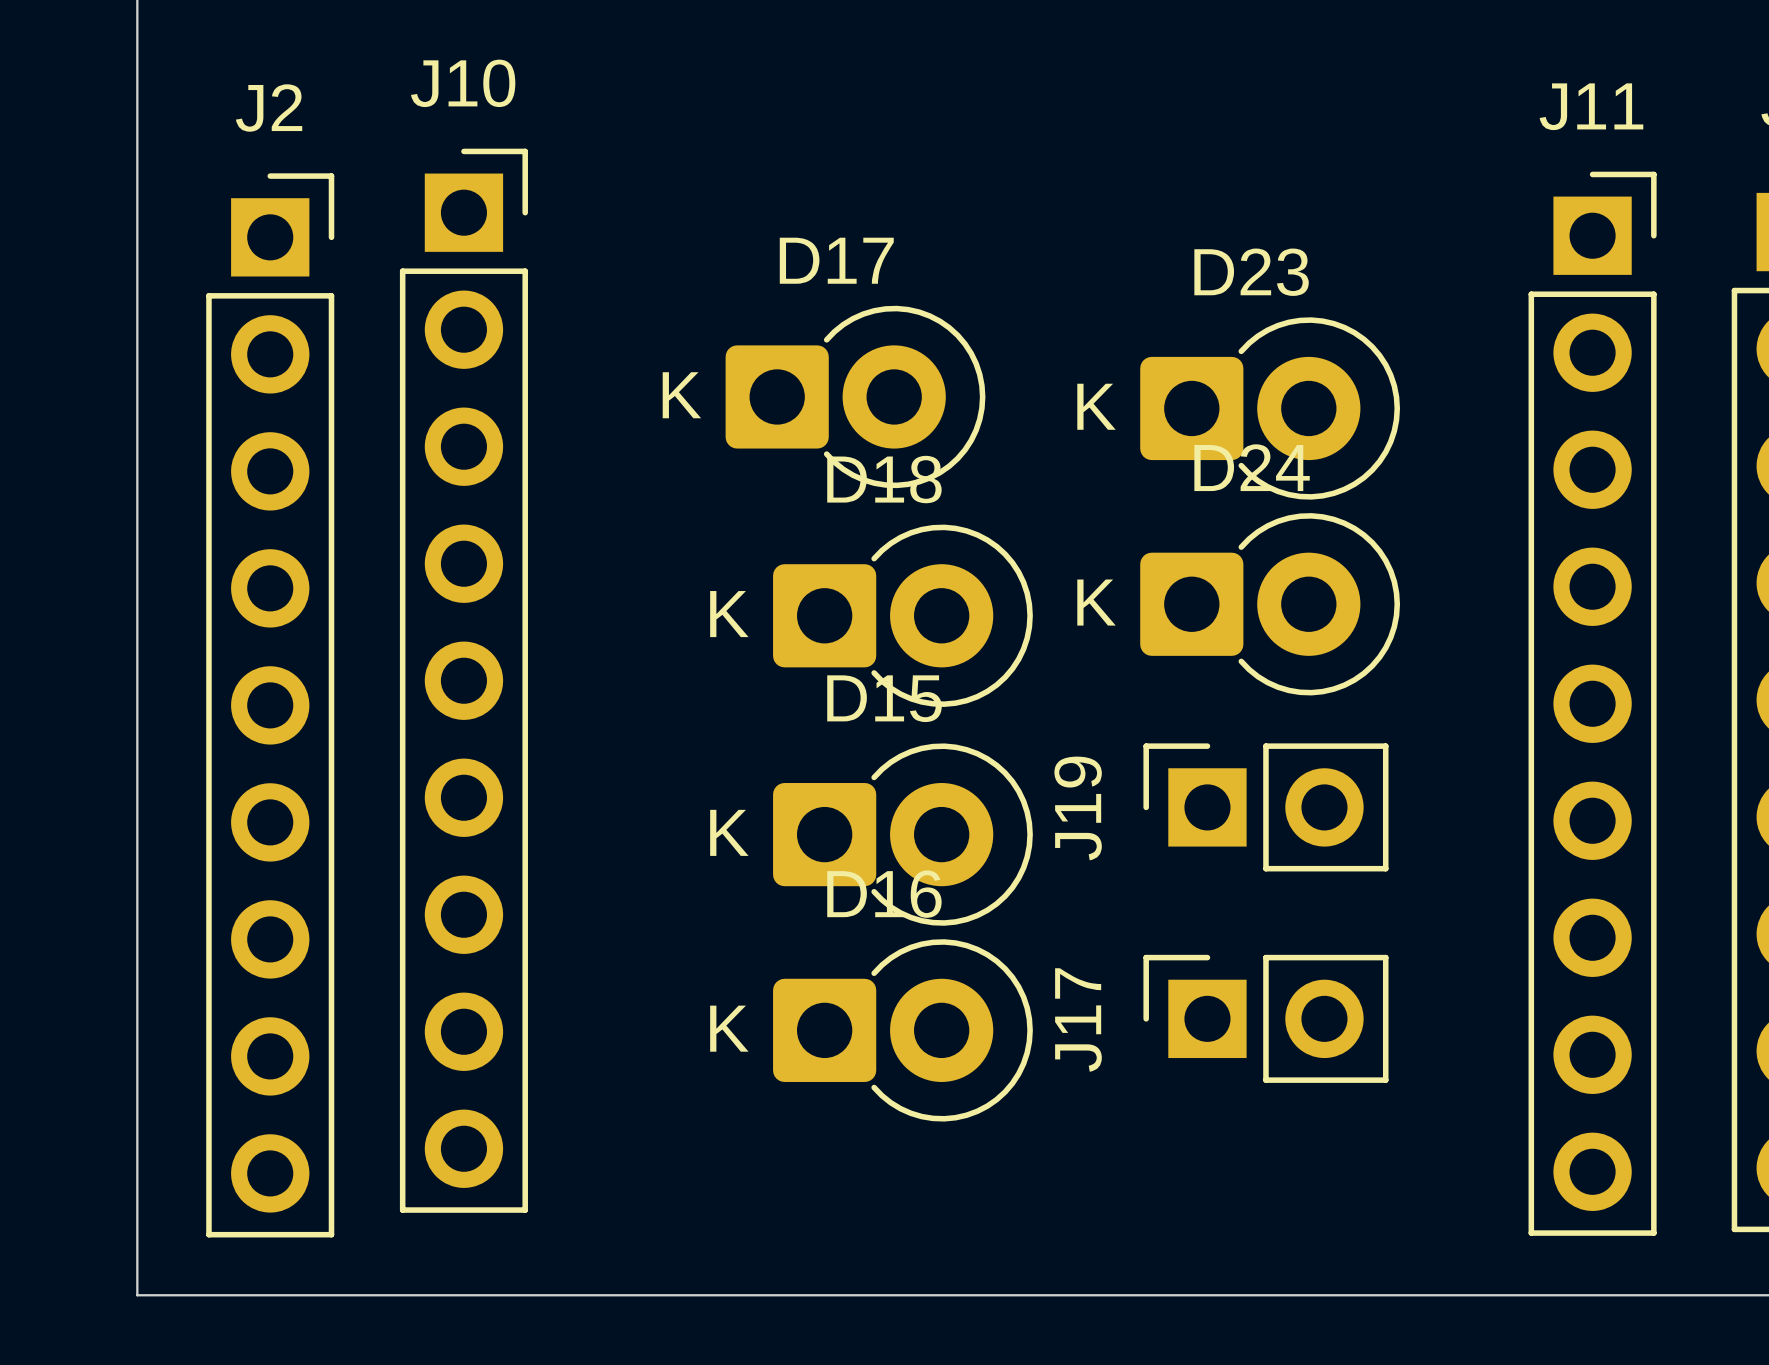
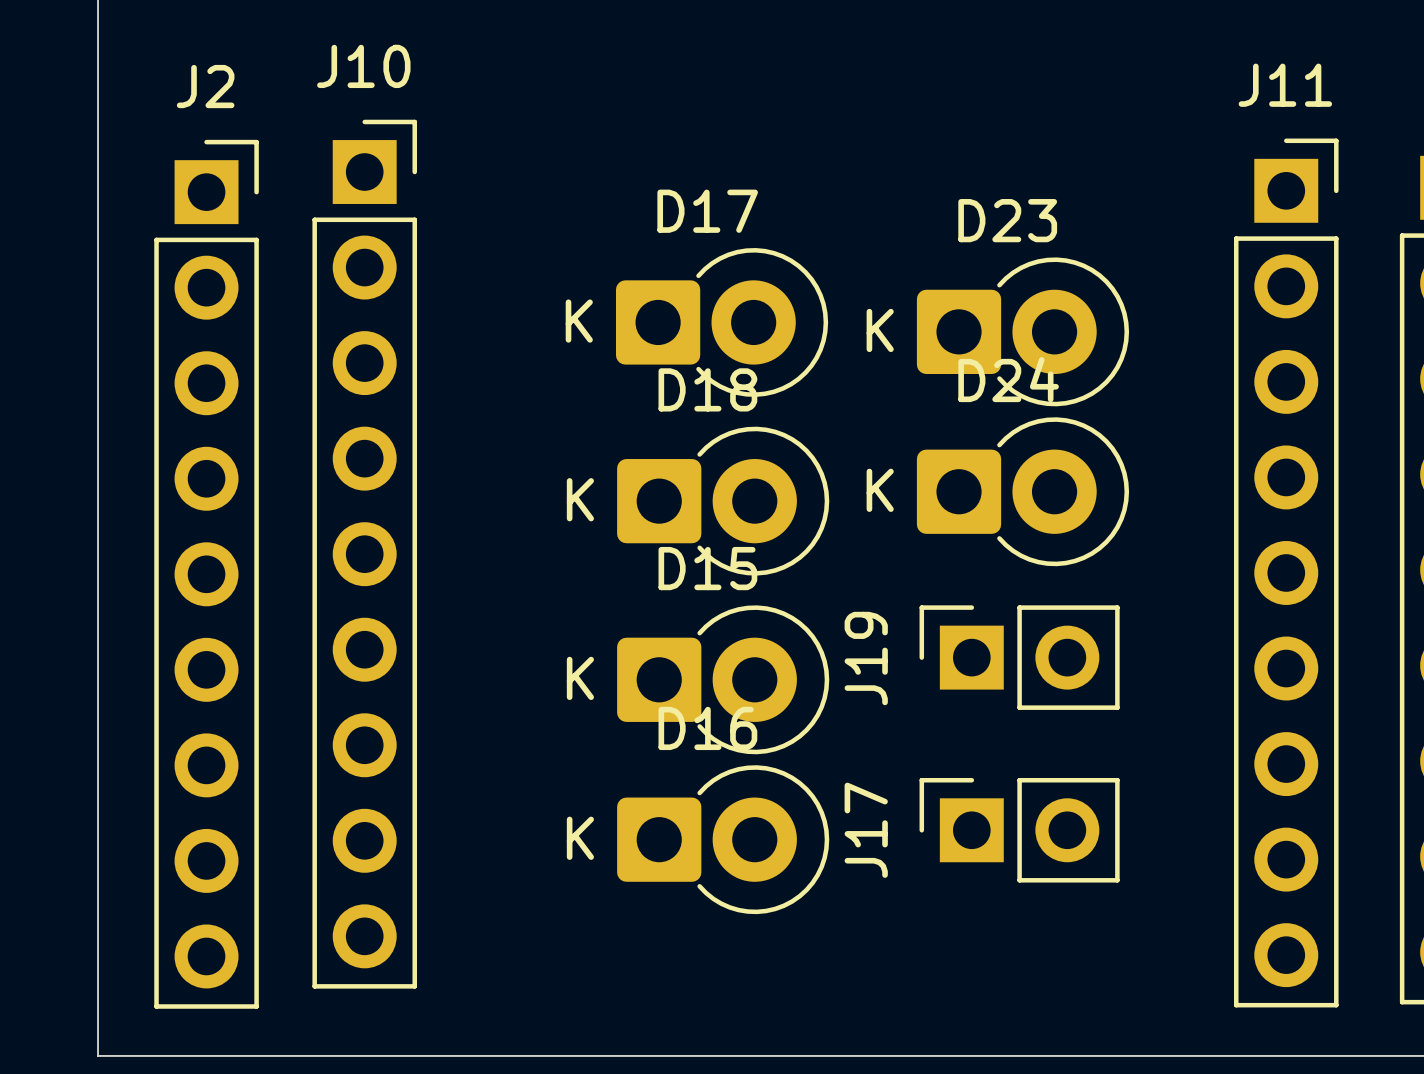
D17 position: (855, 396) -> (722, 322)

